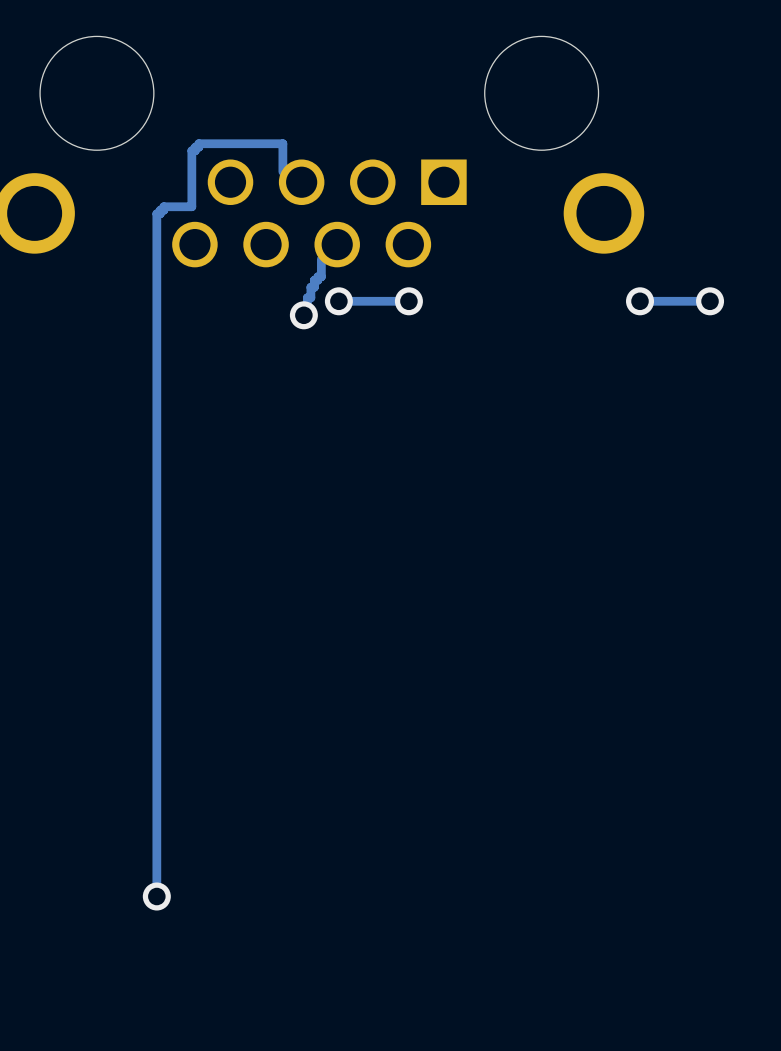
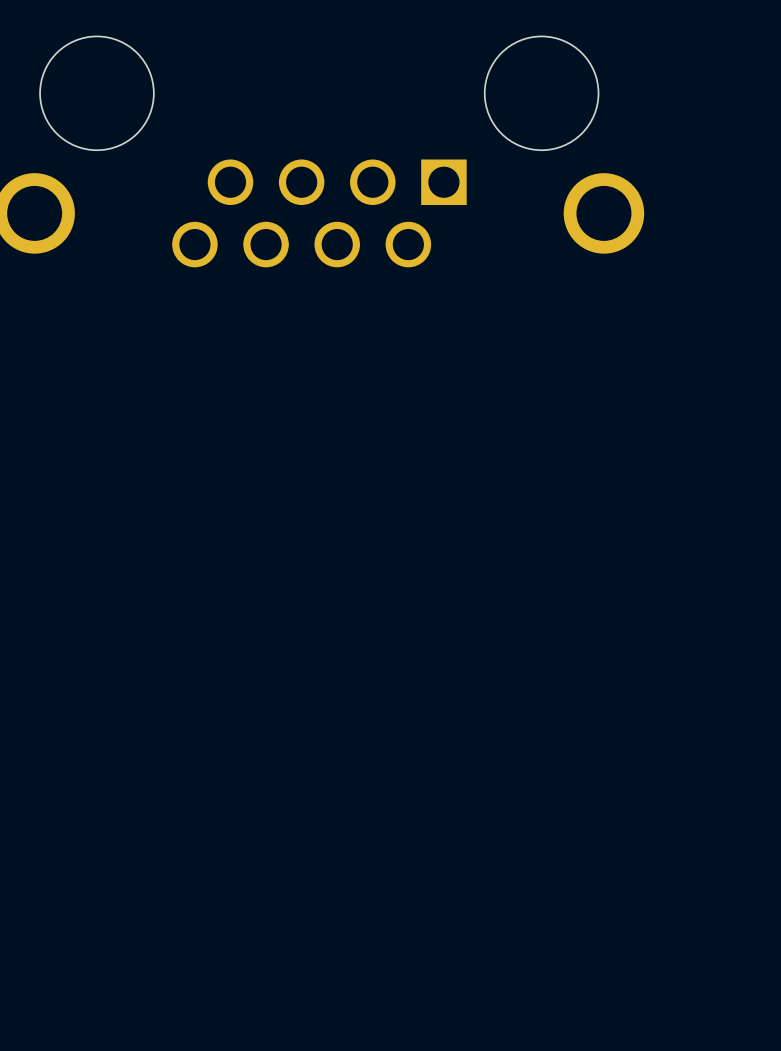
track: (282, 171) (282, 143) (198, 143) (198, 147) (195, 147) (195, 150) (191, 150) (191, 206) (163, 206) (163, 210) (160, 210) (160, 213) (156, 213) (156, 896) -> none
track: (321, 259) (321, 276) (317, 276) (317, 280) (314, 280) (314, 287) (310, 287) (310, 297) (307, 297) (307, 315) (303, 315) -> none
via: (338, 301) -> none
track: (408, 301) (338, 301) -> none
via: (408, 301) -> none
via: (640, 301) -> none
track: (710, 301) (640, 301) -> none
via: (710, 301) -> none
via: (303, 315) -> none
via: (156, 896) -> none

